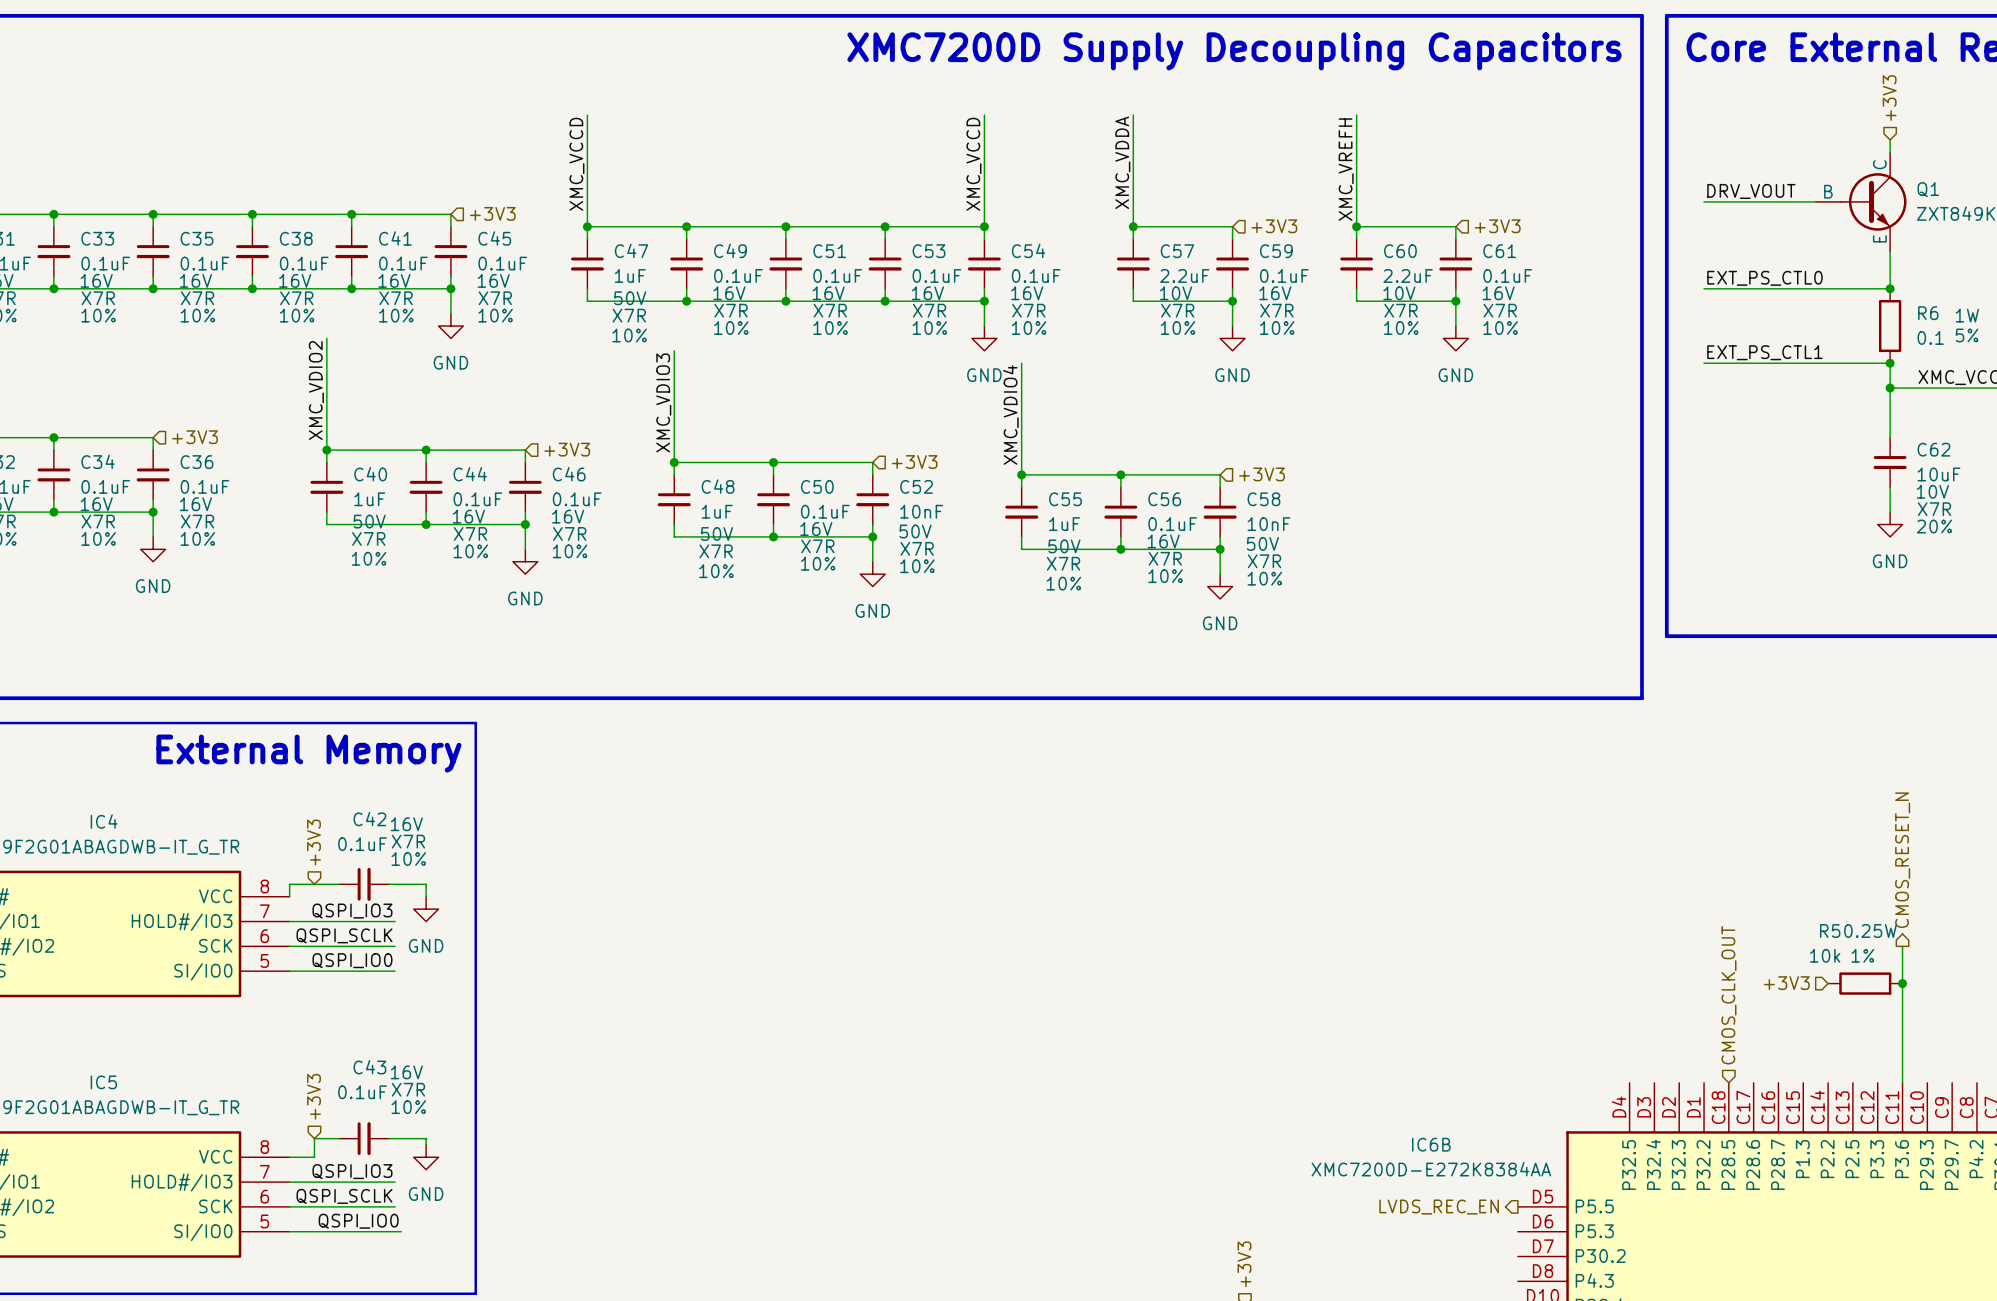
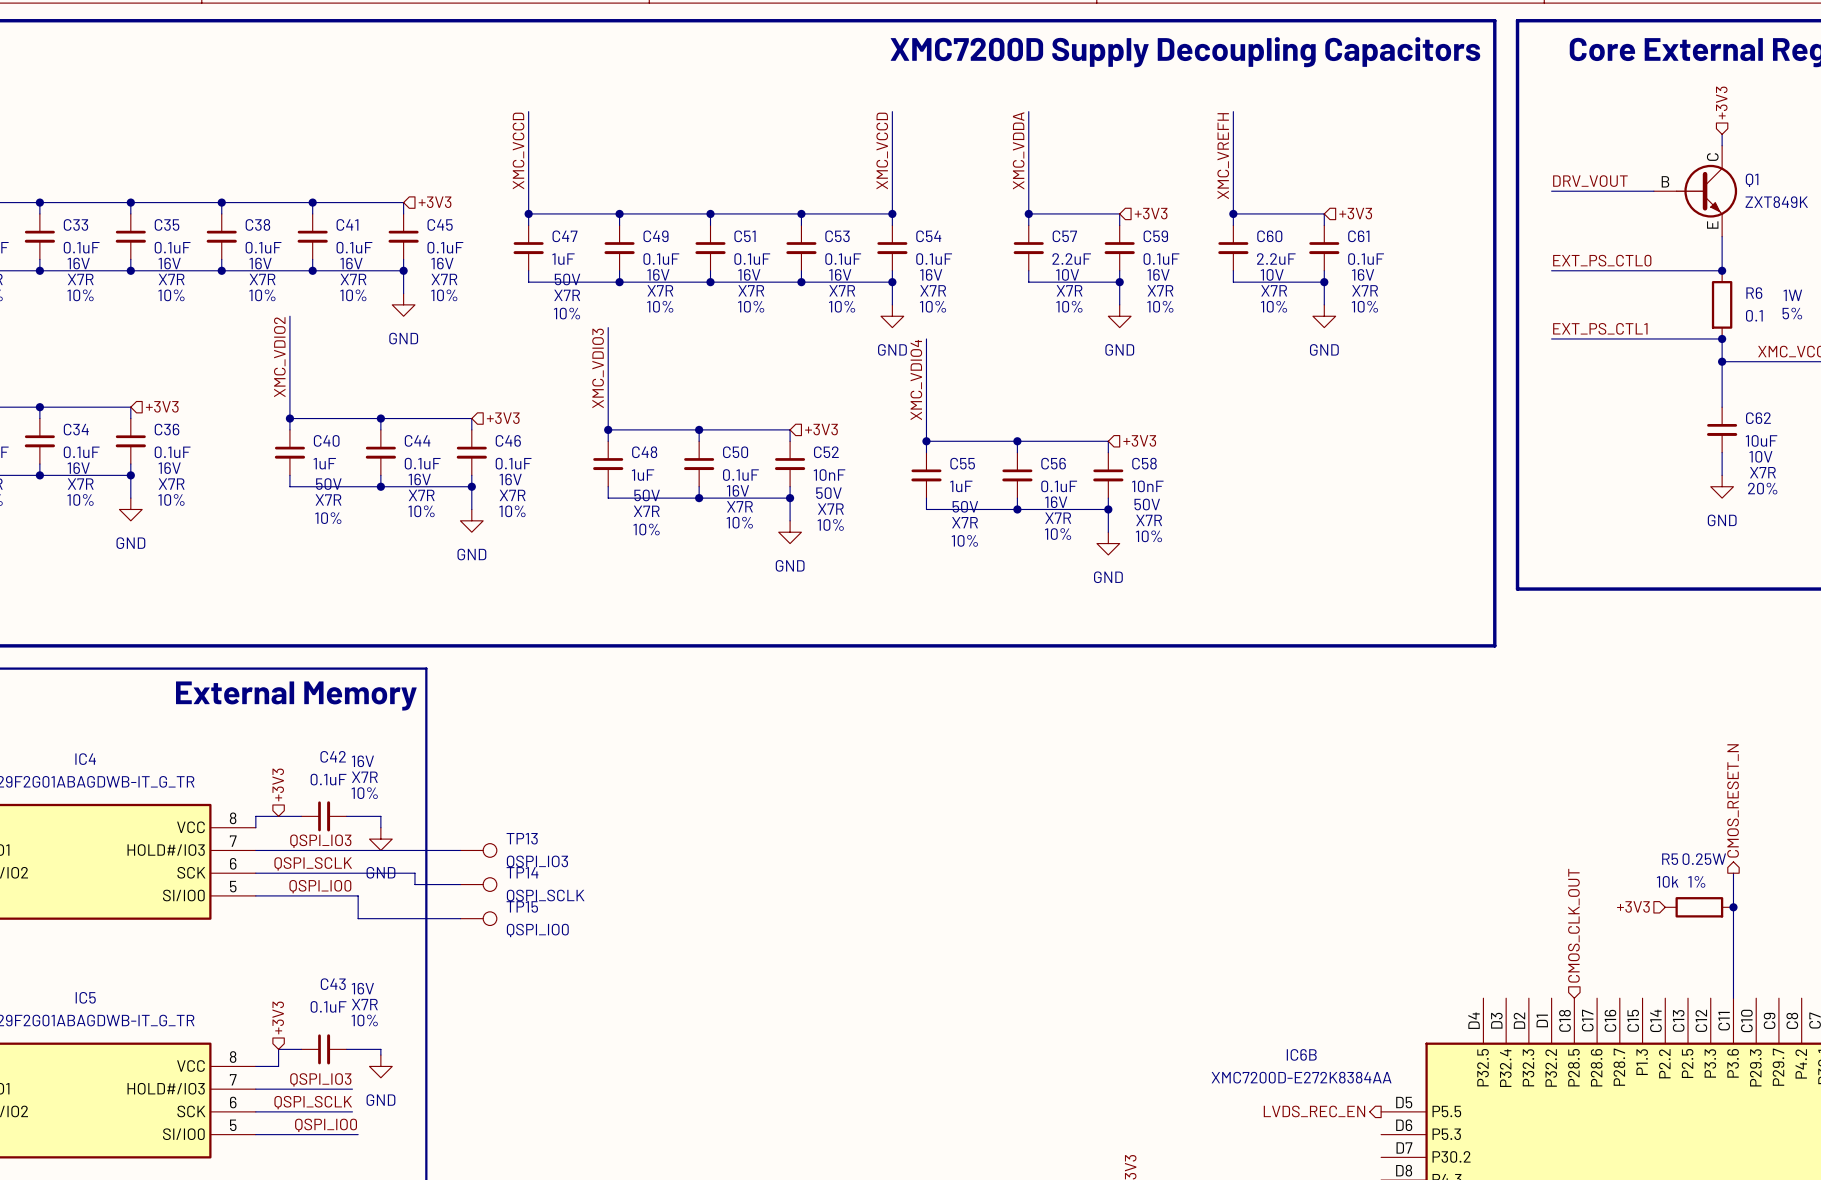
wire: none -> (352, 850) (460, 850)
TP13: none -> QSPI_IO3 (478, 850)
wire: none -> (352, 873) (414, 873) (414, 884) (460, 884)
TP14: none -> QSPI_SCLK (478, 884)
wire: none -> (352, 895) (358, 895) (358, 918) (460, 918)
TP15: none -> QSPI_IO0 (478, 918)

